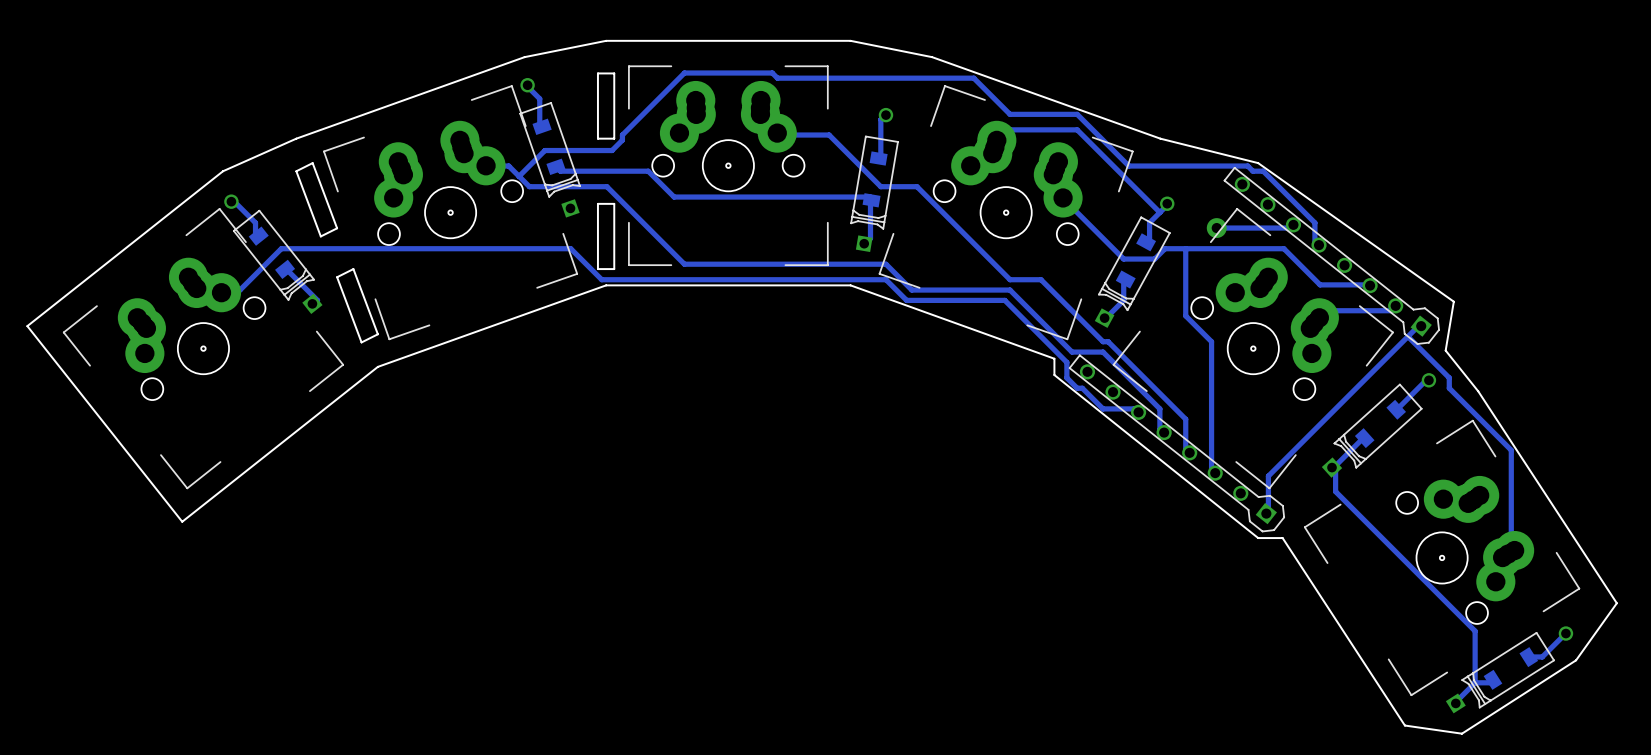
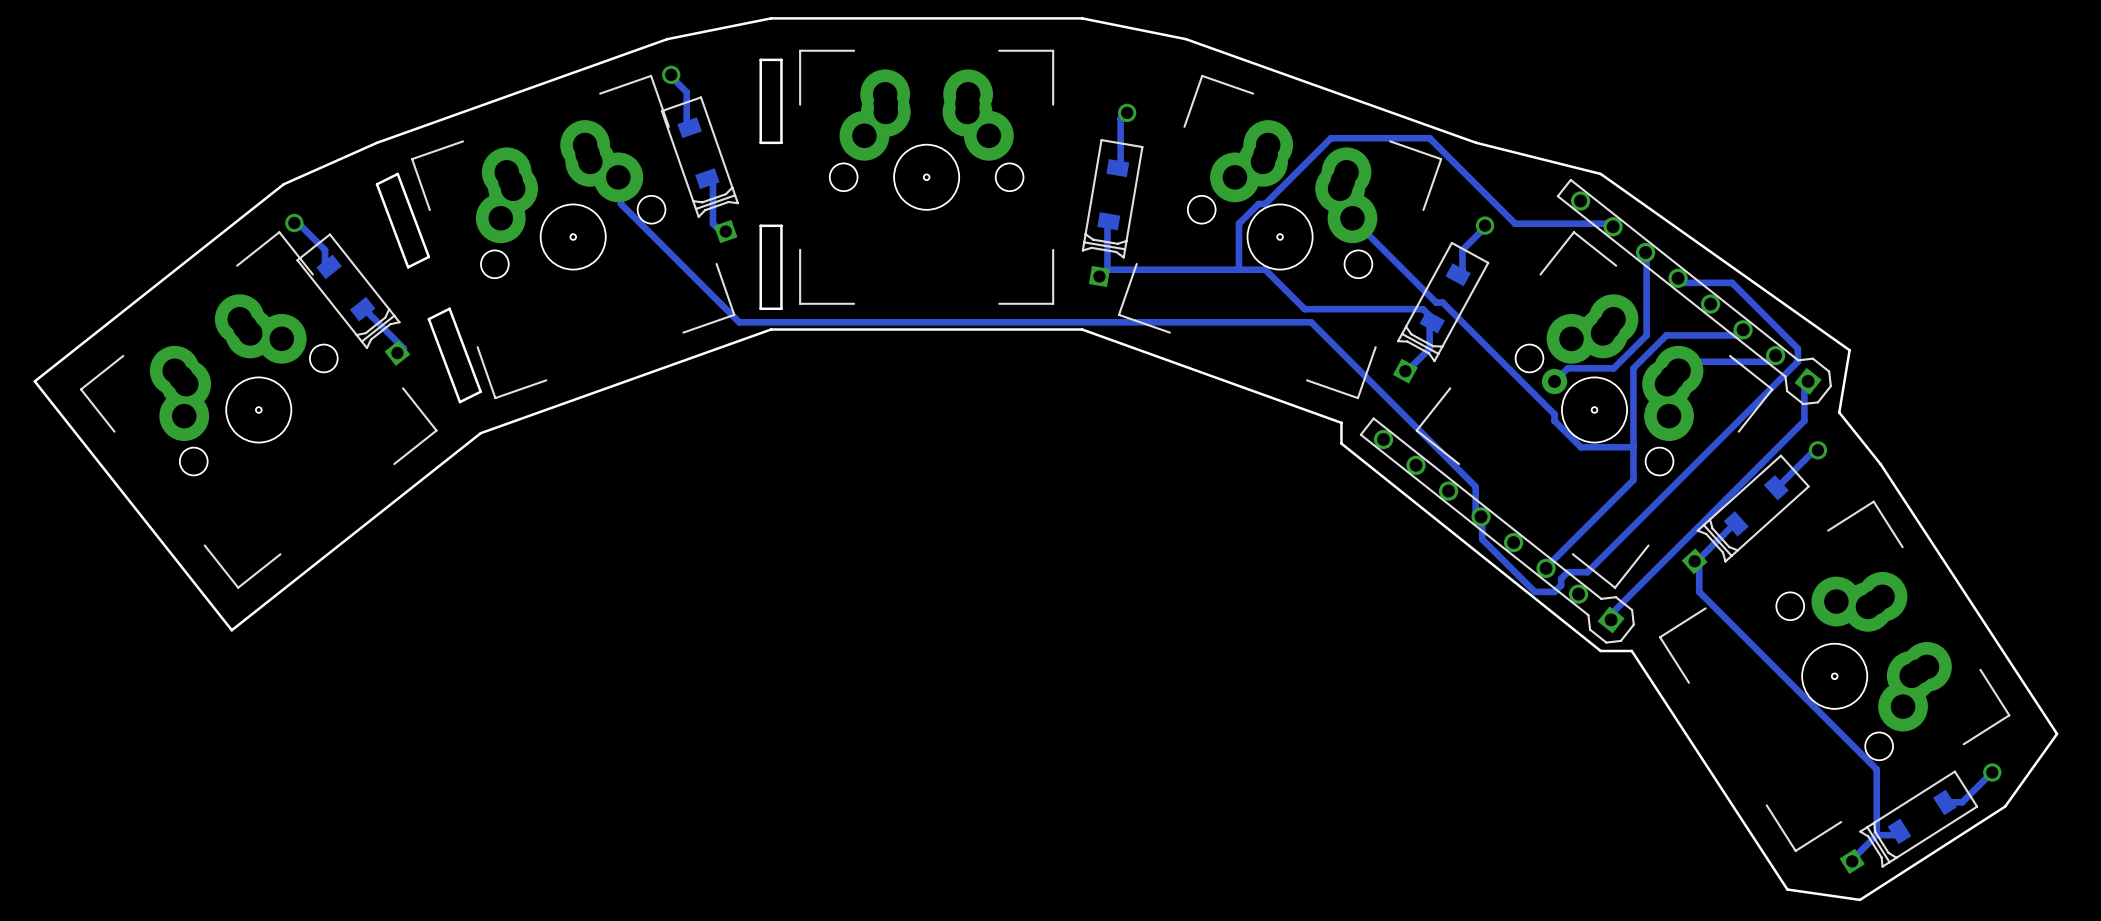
track: (777, 133) (777, 135) (829, 135) (880, 186) (917, 186) (1010, 279) -> (1127, 322) (1284, 322)
track: (996, 140) (999, 140) (1010, 129) (1077, 129) (1159, 212) -> none
track: (488, 166) (508, 166) (529, 186) (606, 186) (684, 264) (886, 264) (911, 290) (1010, 290) (1072, 352) (1103, 352) -> none
track: (560, 171) (648, 171) (674, 197) (870, 197) (871, 200) -> (712, 184) (712, 223) (719, 230) (725, 231)
track: (519, 176) (544, 150) (612, 150) (622, 140) (622, 135) (684, 73) (772, 73) (777, 78) (973, 78) (1010, 114) (1077, 114) (1128, 166) (1247, 166) (1252, 171) (1263, 171) (1314, 222) (1314, 243) (1319, 245) -> (1481, 516) (1482, 539) (1534, 591) (1554, 591) (1561, 585) (1561, 578) (1567, 572) (1587, 572) (1797, 361) (1797, 348) (1732, 282) (1679, 282) (1678, 278)
track: none -> (1613, 226) (1607, 223) (1515, 223) (1429, 138) (1331, 138) (1265, 203) (1258, 203) (1238, 223) (1238, 269)
track: (1293, 224) (1289, 228) (1216, 228) -> (1645, 252) (1646, 335) (1613, 368) (1567, 368) (1554, 381)
via: (1216, 228) -> none
track: none -> (1099, 276) (1107, 269) (1265, 269) (1304, 309) (1423, 309) (1429, 315) (1432, 322)
track: (1185, 248) (1185, 315) -> (1429, 296) (1436, 302) (1442, 302) (1508, 368)
track: (1123, 259) (1154, 259) (1165, 248) (1283, 248) (1320, 284) (1370, 285) -> (1546, 568) (1633, 480) (1633, 368) (1666, 335) (1738, 335) (1743, 329)
track: (601, 279) (570, 248) (281, 248) (240, 290) (224, 290) (221, 292) -> (765, 322) (739, 322) (620, 203) (620, 177)
track: (886, 279) (906, 300) (1004, 300) (1066, 362) (1066, 377) (1077, 388) (1082, 388) (1103, 408) (1134, 408) (1138, 412) -> none
track: (1030, 279) (1041, 279) (1103, 341) (1108, 341) (1185, 419) (1185, 450) (1189, 452) -> (1311, 322) (1403, 414)
via: none -> (1554, 381)
track: (1418, 326) (1268, 476) (1268, 512) (1266, 513) -> (1804, 381) (1804, 420) (1607, 618) (1611, 619)
track: (1407, 336) (1449, 377) (1449, 388) (1511, 450) (1511, 548) (1508, 554) -> none
track: (1211, 341) (1211, 470) (1215, 473) -> (1541, 401) (1554, 414) (1554, 420) (1580, 447) (1633, 447)

